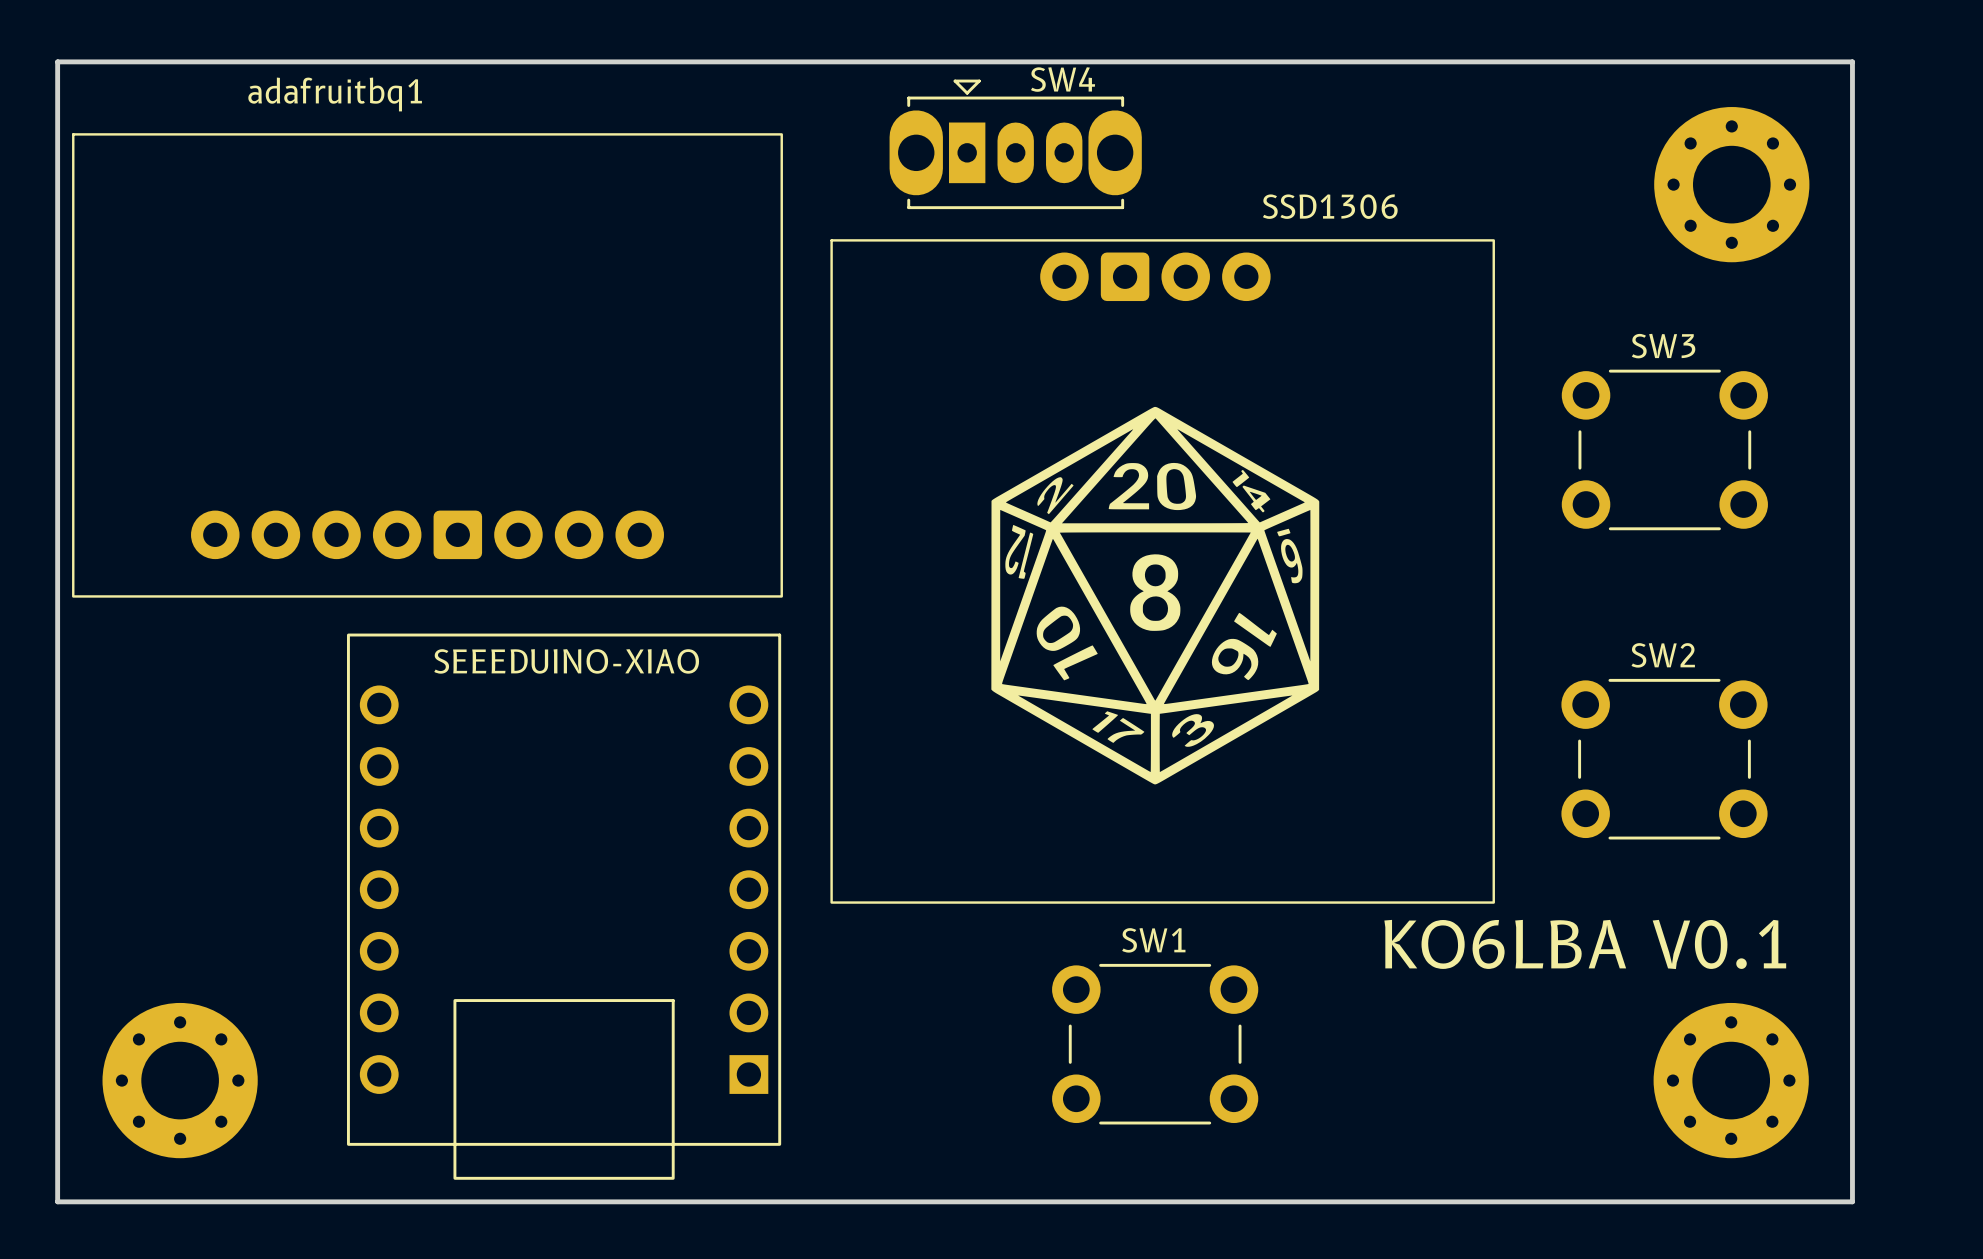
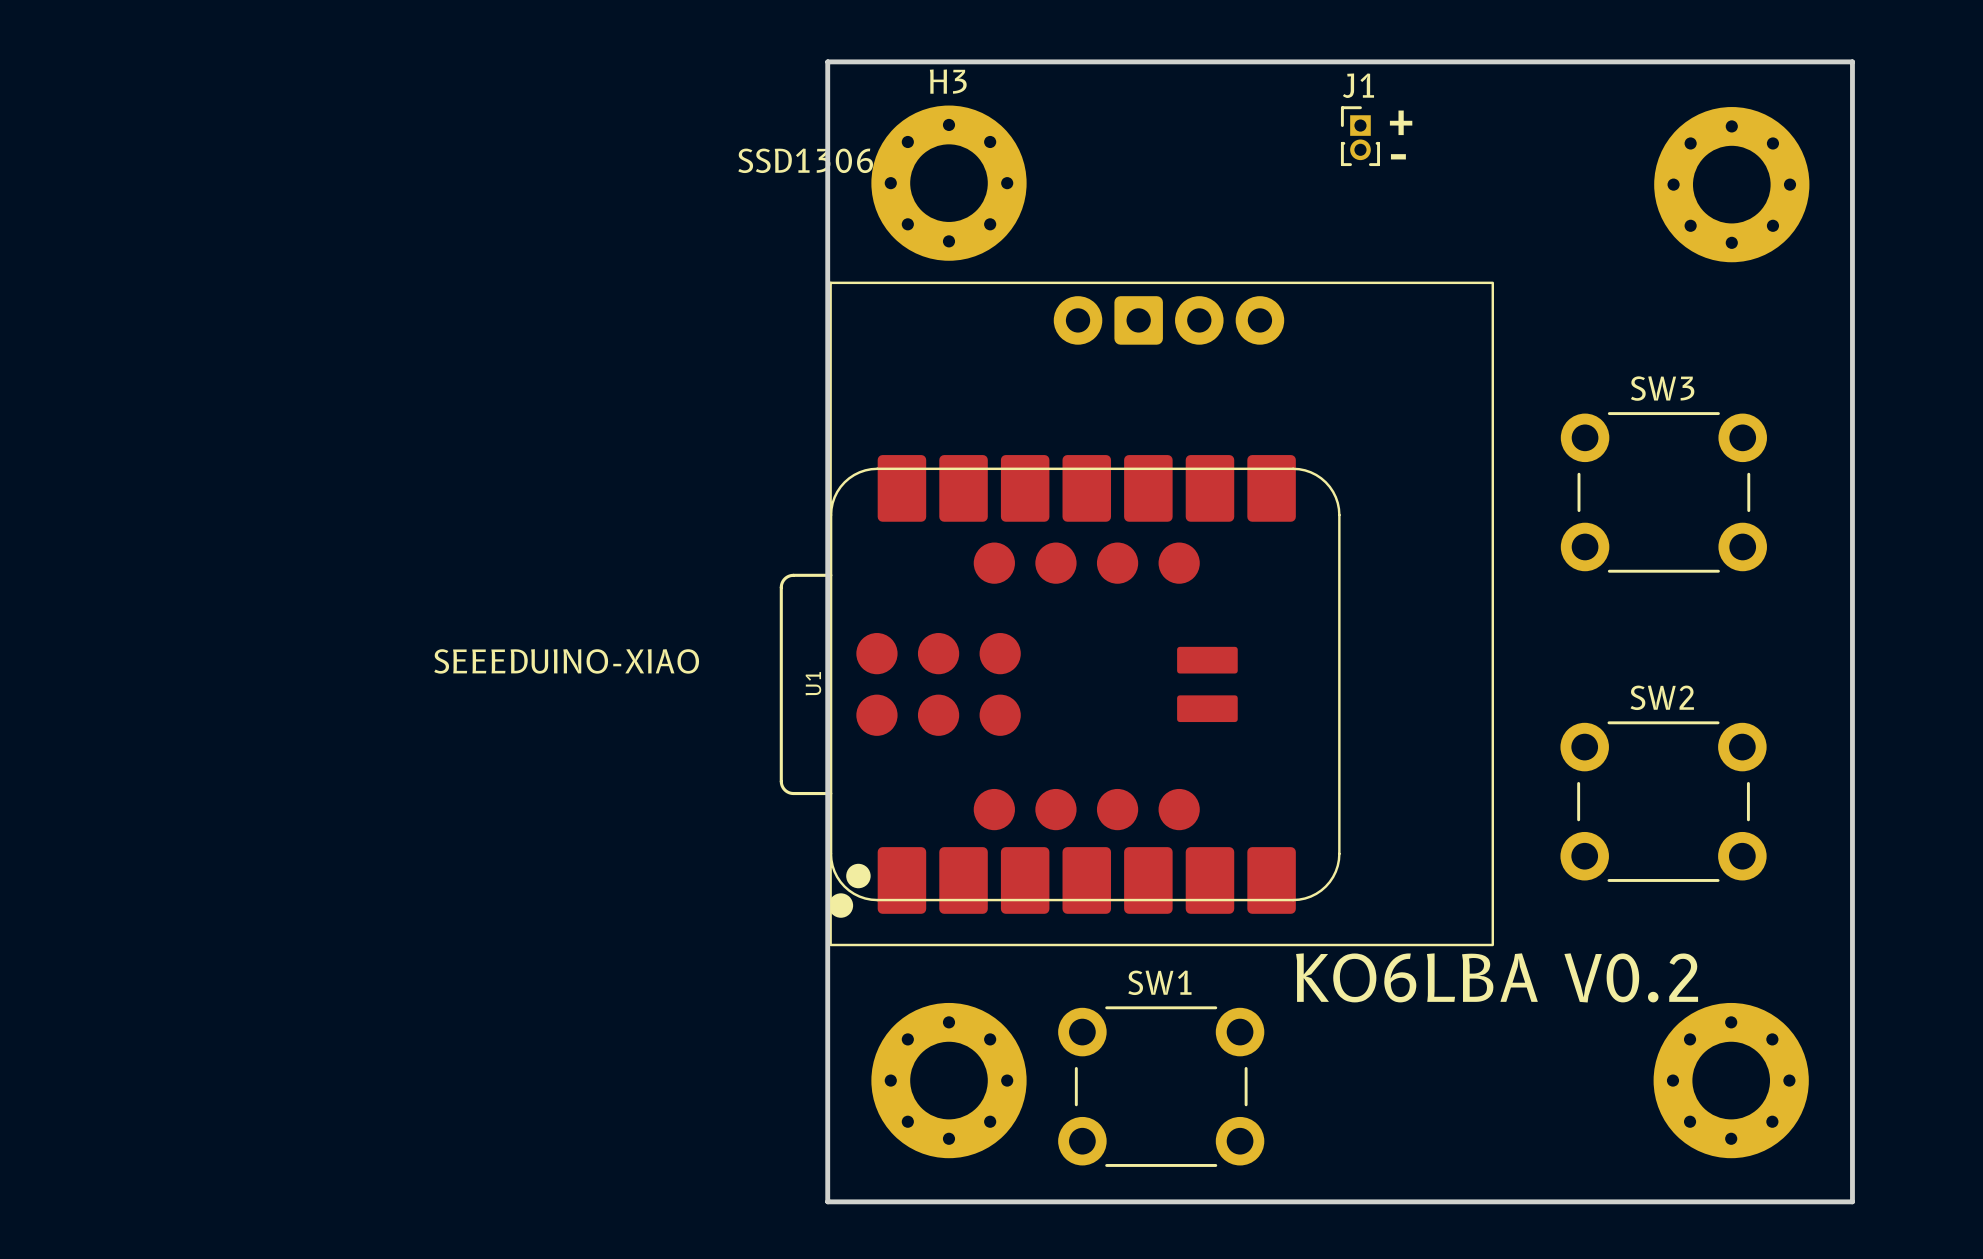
board edge: (827, 61) (57, 61) (57, 1201) (827, 1201) -> (827, 61) (827, 1201)
text: none -> + (1401, 122)
J1: none -> (1360, 136)
SW4: (1015, 144) -> none
text: none -> - (1398, 156)
H3: none -> (948, 183)
SSD1306 name position: SSD1306 (1330, 206) -> SSD1306 (805, 160)
SSD1306 footprint: [830, 239, 1495, 904] -> [829, 281, 1494, 947]
adafruitbq1: (427, 365) -> none
drawing: [991, 406, 1320, 785] -> none
SW3 position: (1664, 449) -> (1663, 492)
U1: none -> (1060, 686)
SW2 position: (1664, 759) -> (1663, 801)
part: (564, 906) -> none
text: KO6LBA V0.1 (1585, 944) -> KO6LBA V0.2 (1497, 977)
SW1 position: (1155, 1044) -> (1161, 1086)
part: (180, 1080) -> none
part: none -> (948, 1080)

